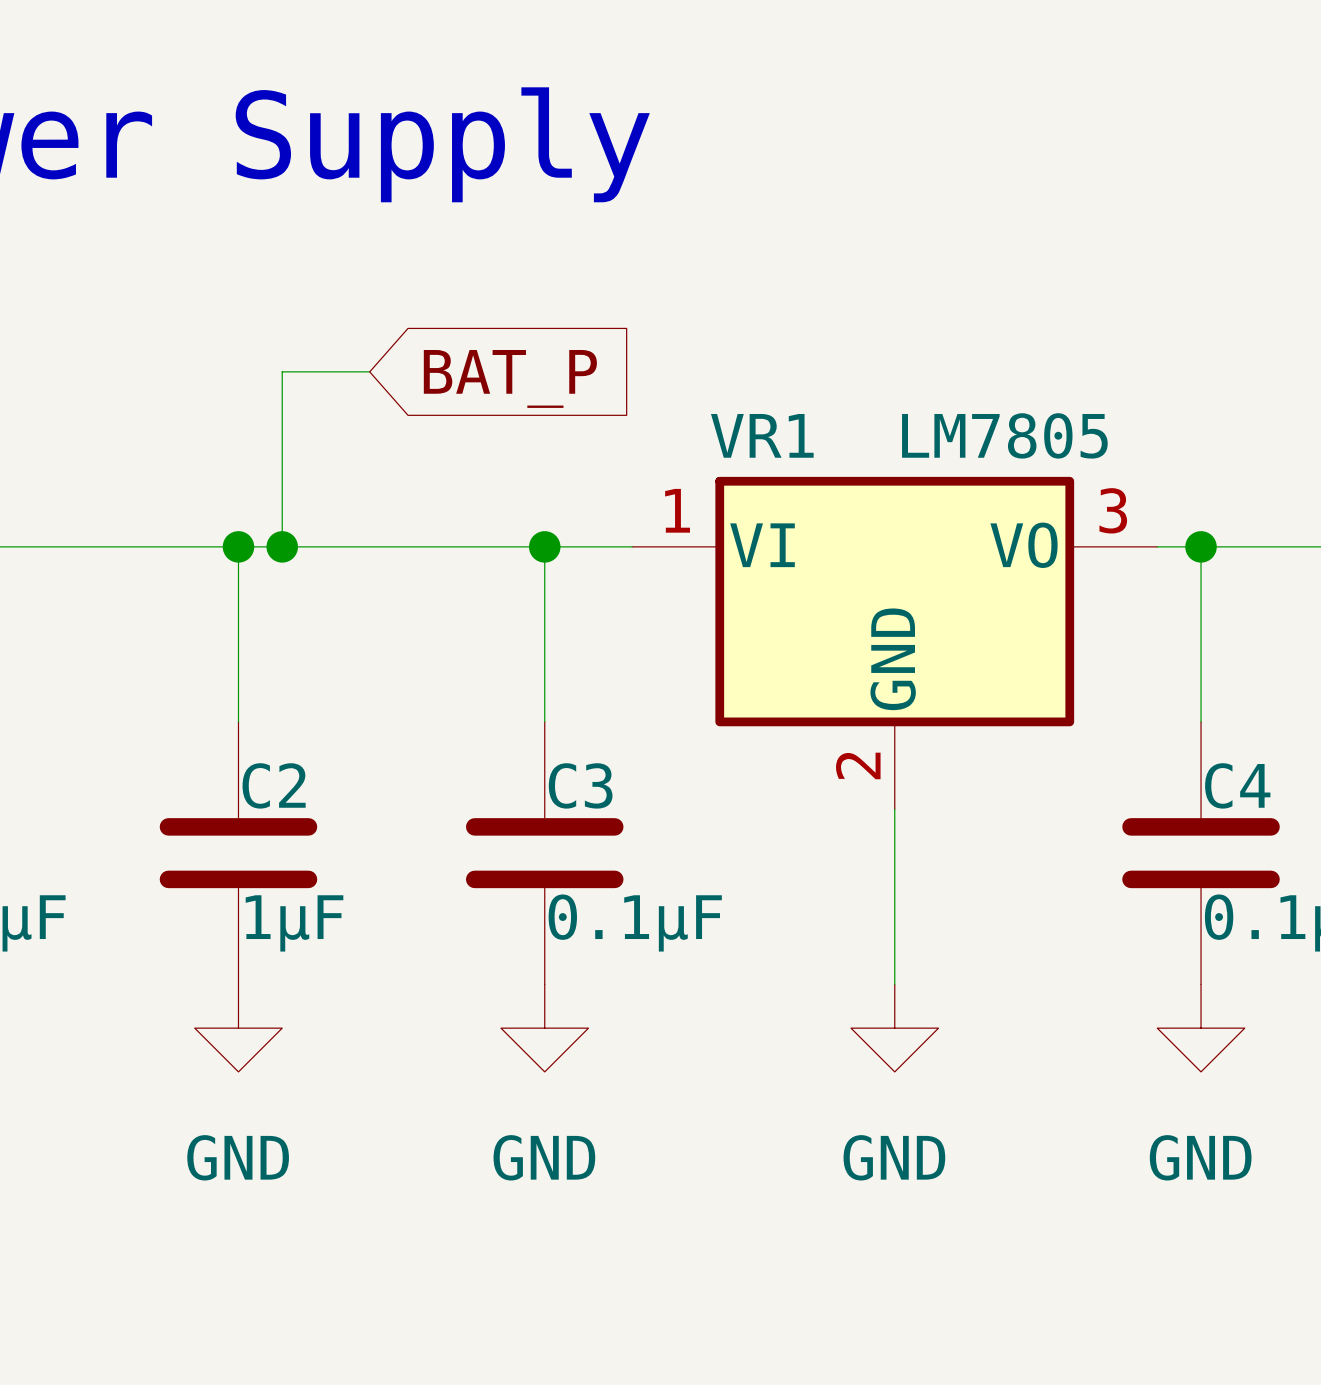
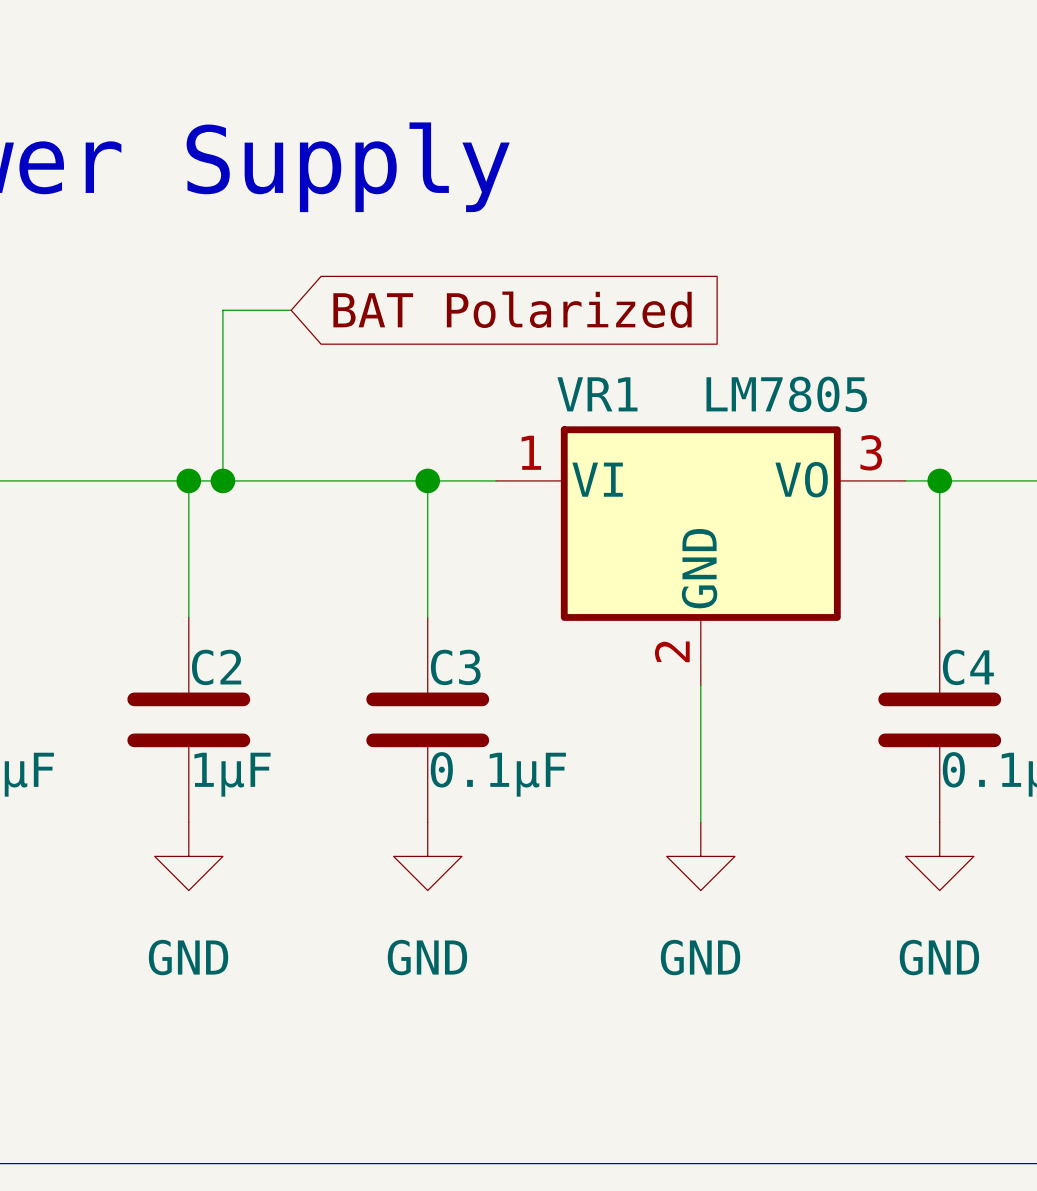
global label: none -> BAT Polarized (512, 309)
wire: (282, 371) (369, 371) -> (222, 344) (222, 310) (291, 310)
global label: BAT_P (510, 378) -> none

